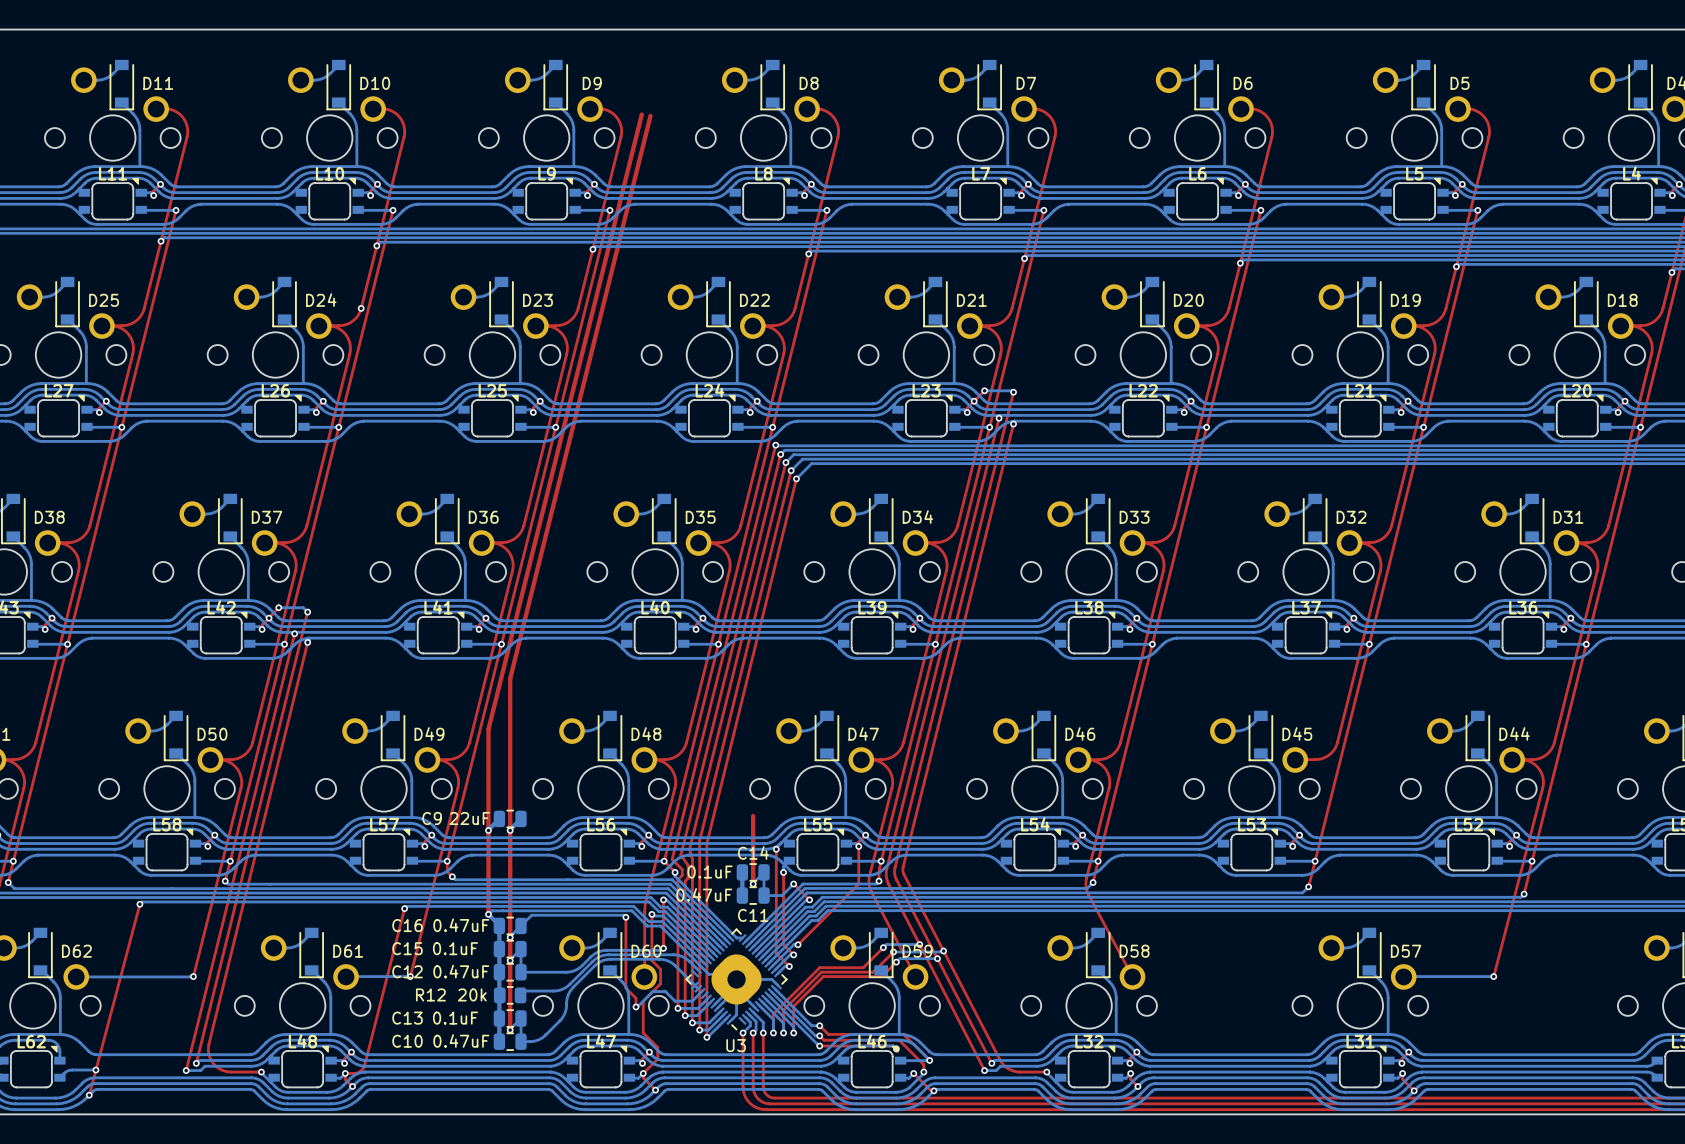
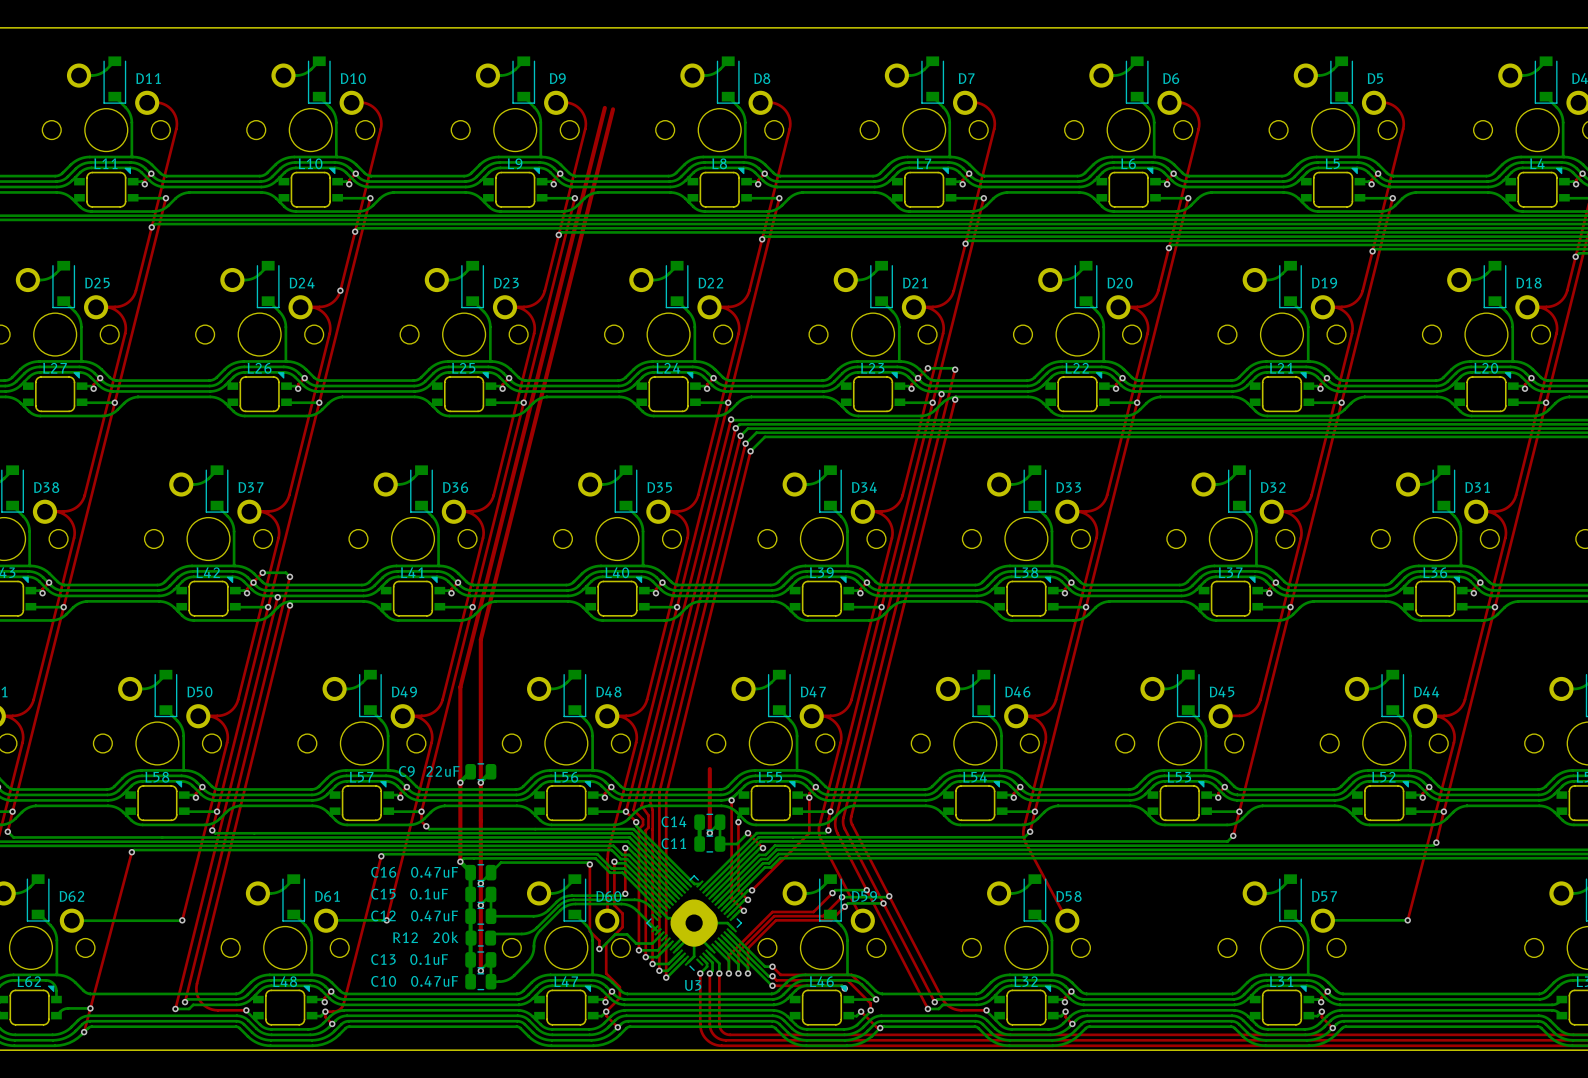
C14 name position: C14 (753, 852) -> C14 (673, 821)
C14 value: 0.1uF (710, 872) -> none
C11 value: 0.47uF (704, 894) -> none
C11 name position: C11 (753, 915) -> C11 (673, 843)

